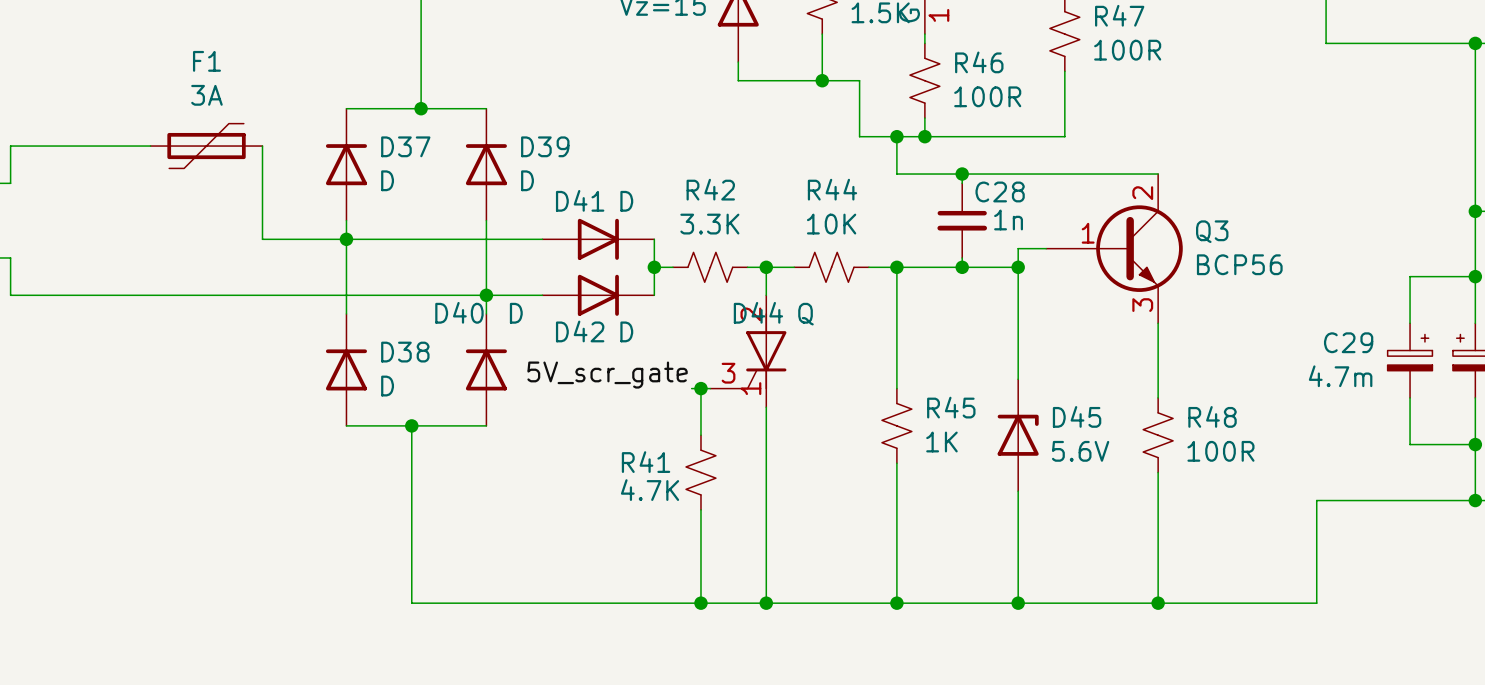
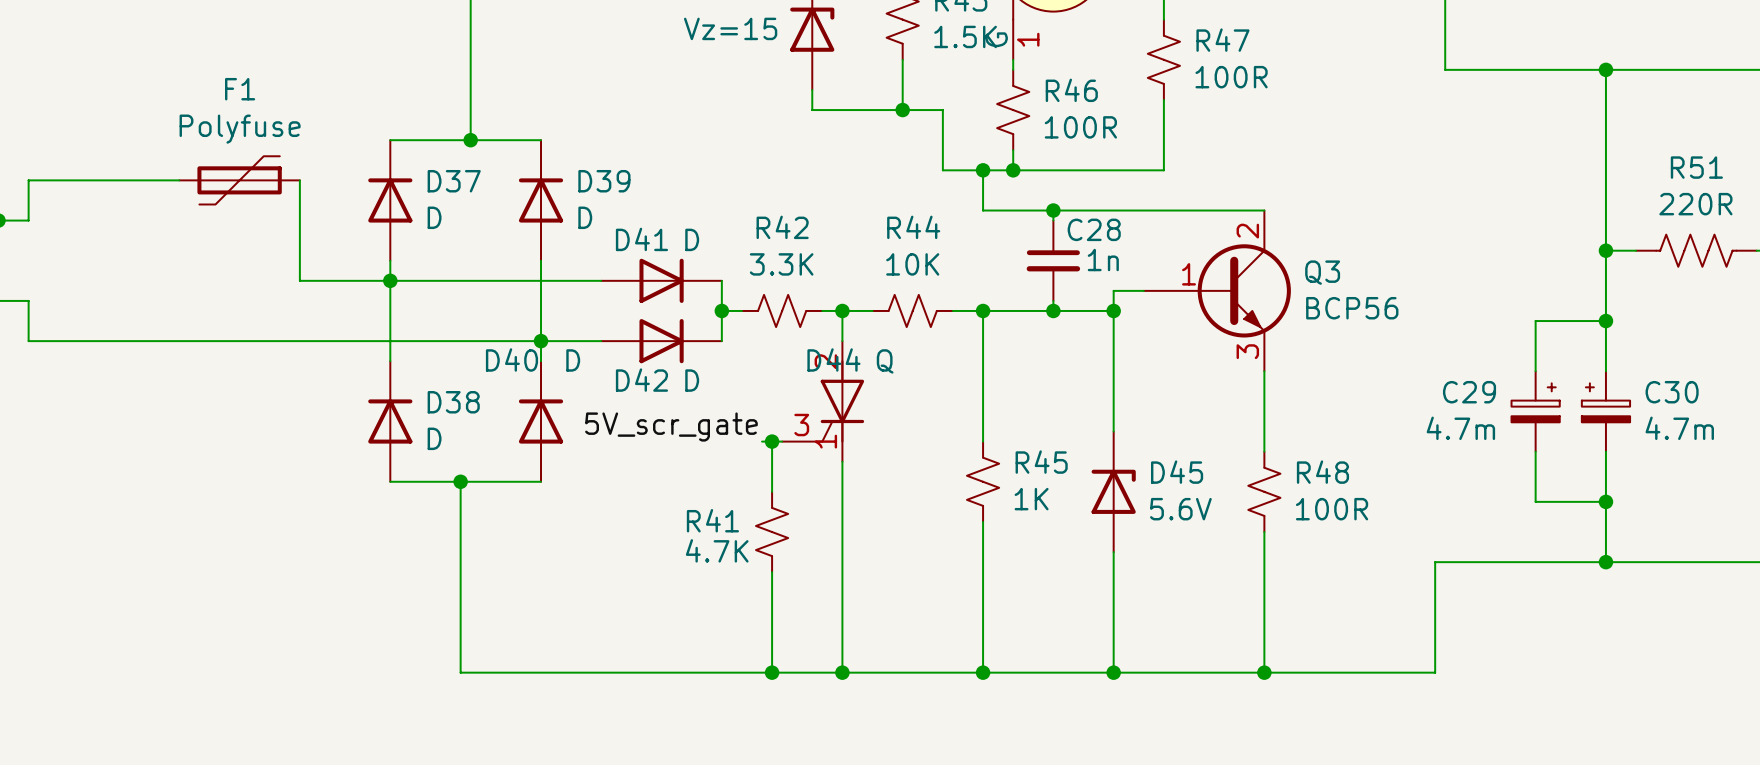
F1 value: 3A (206, 95) -> Polyfuse (240, 129)

